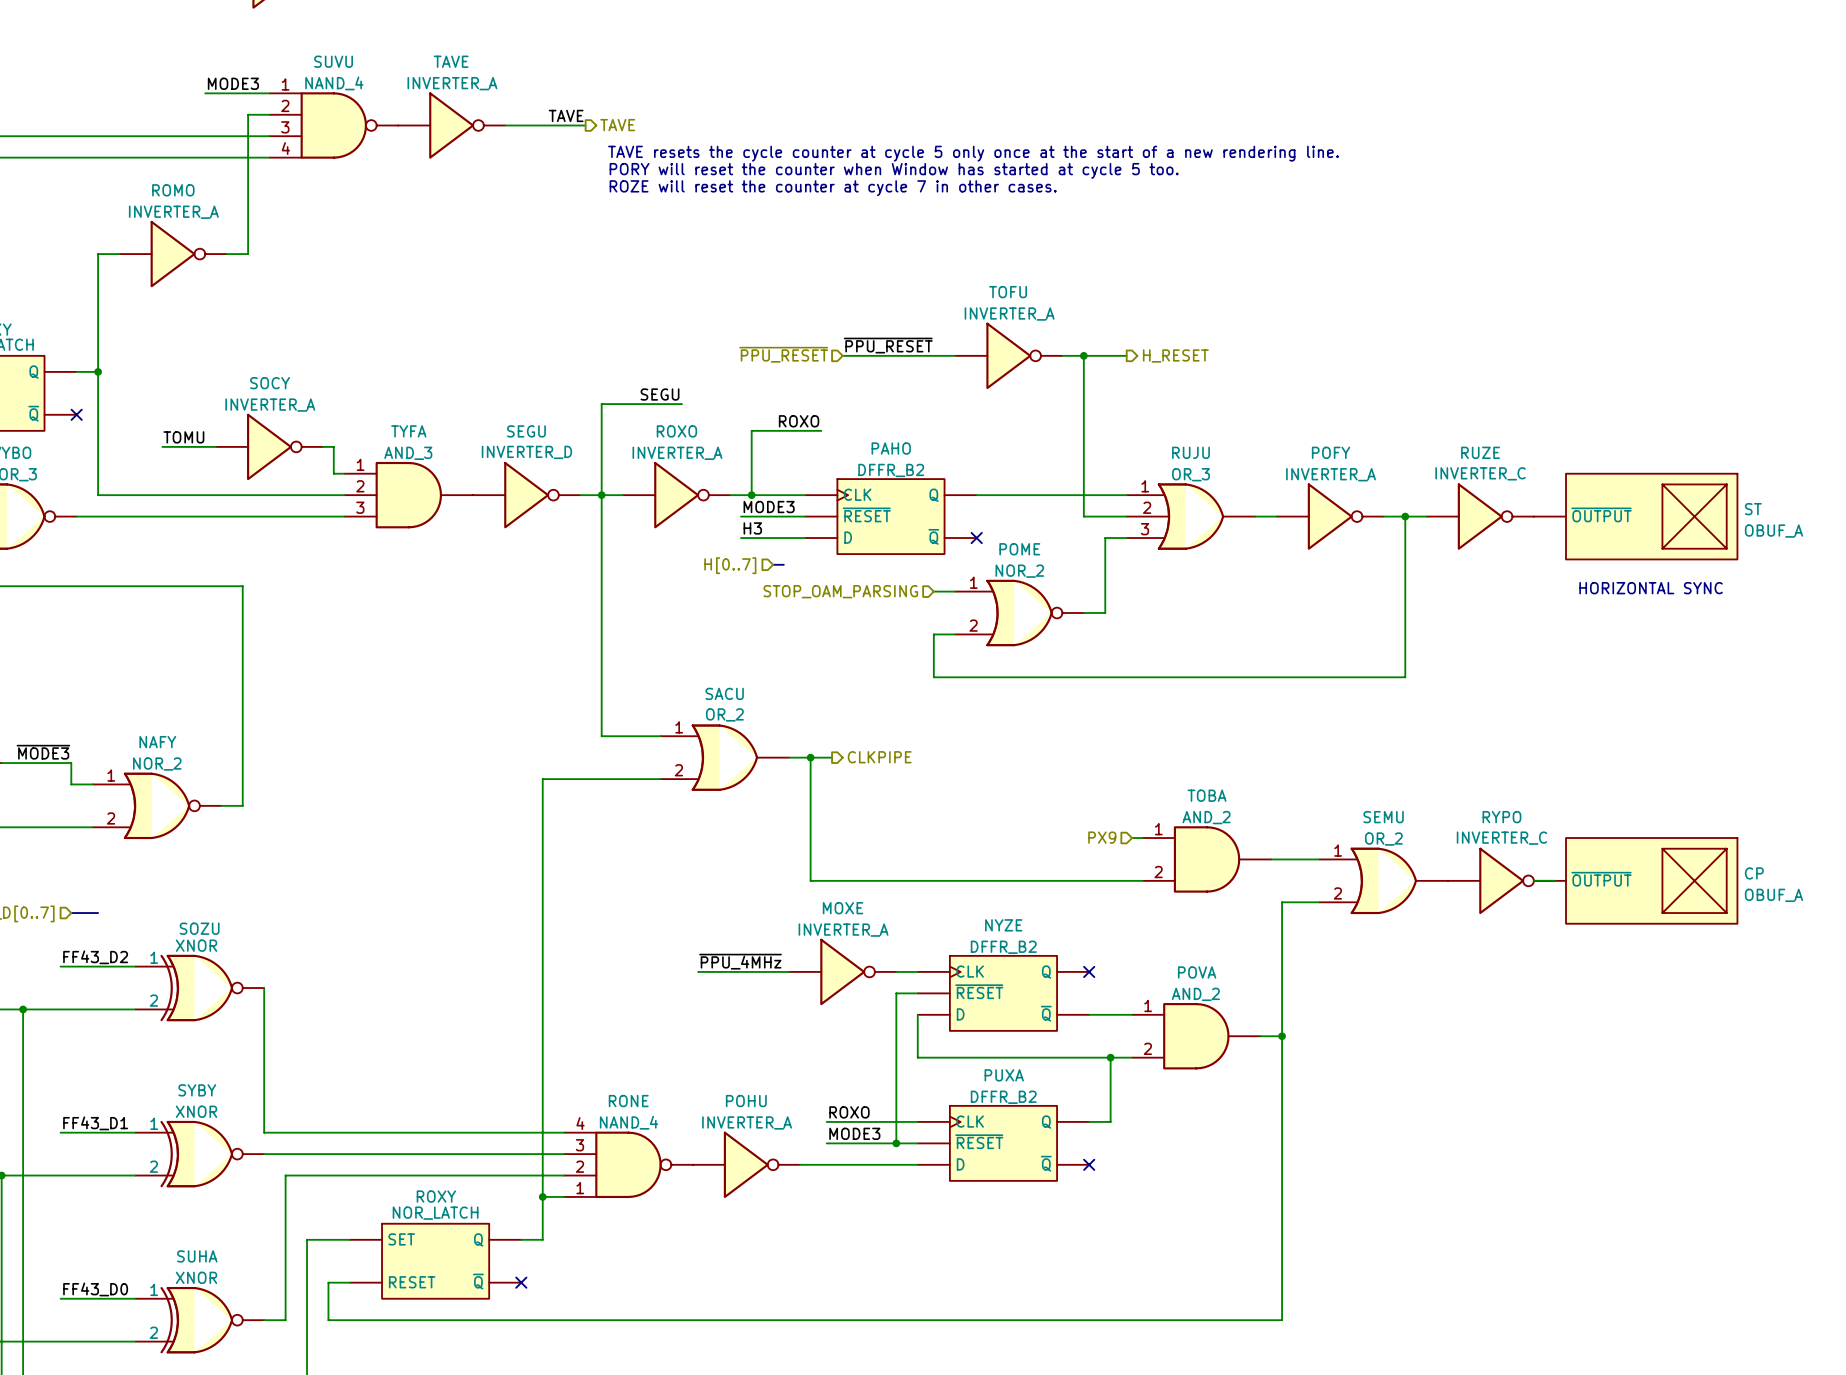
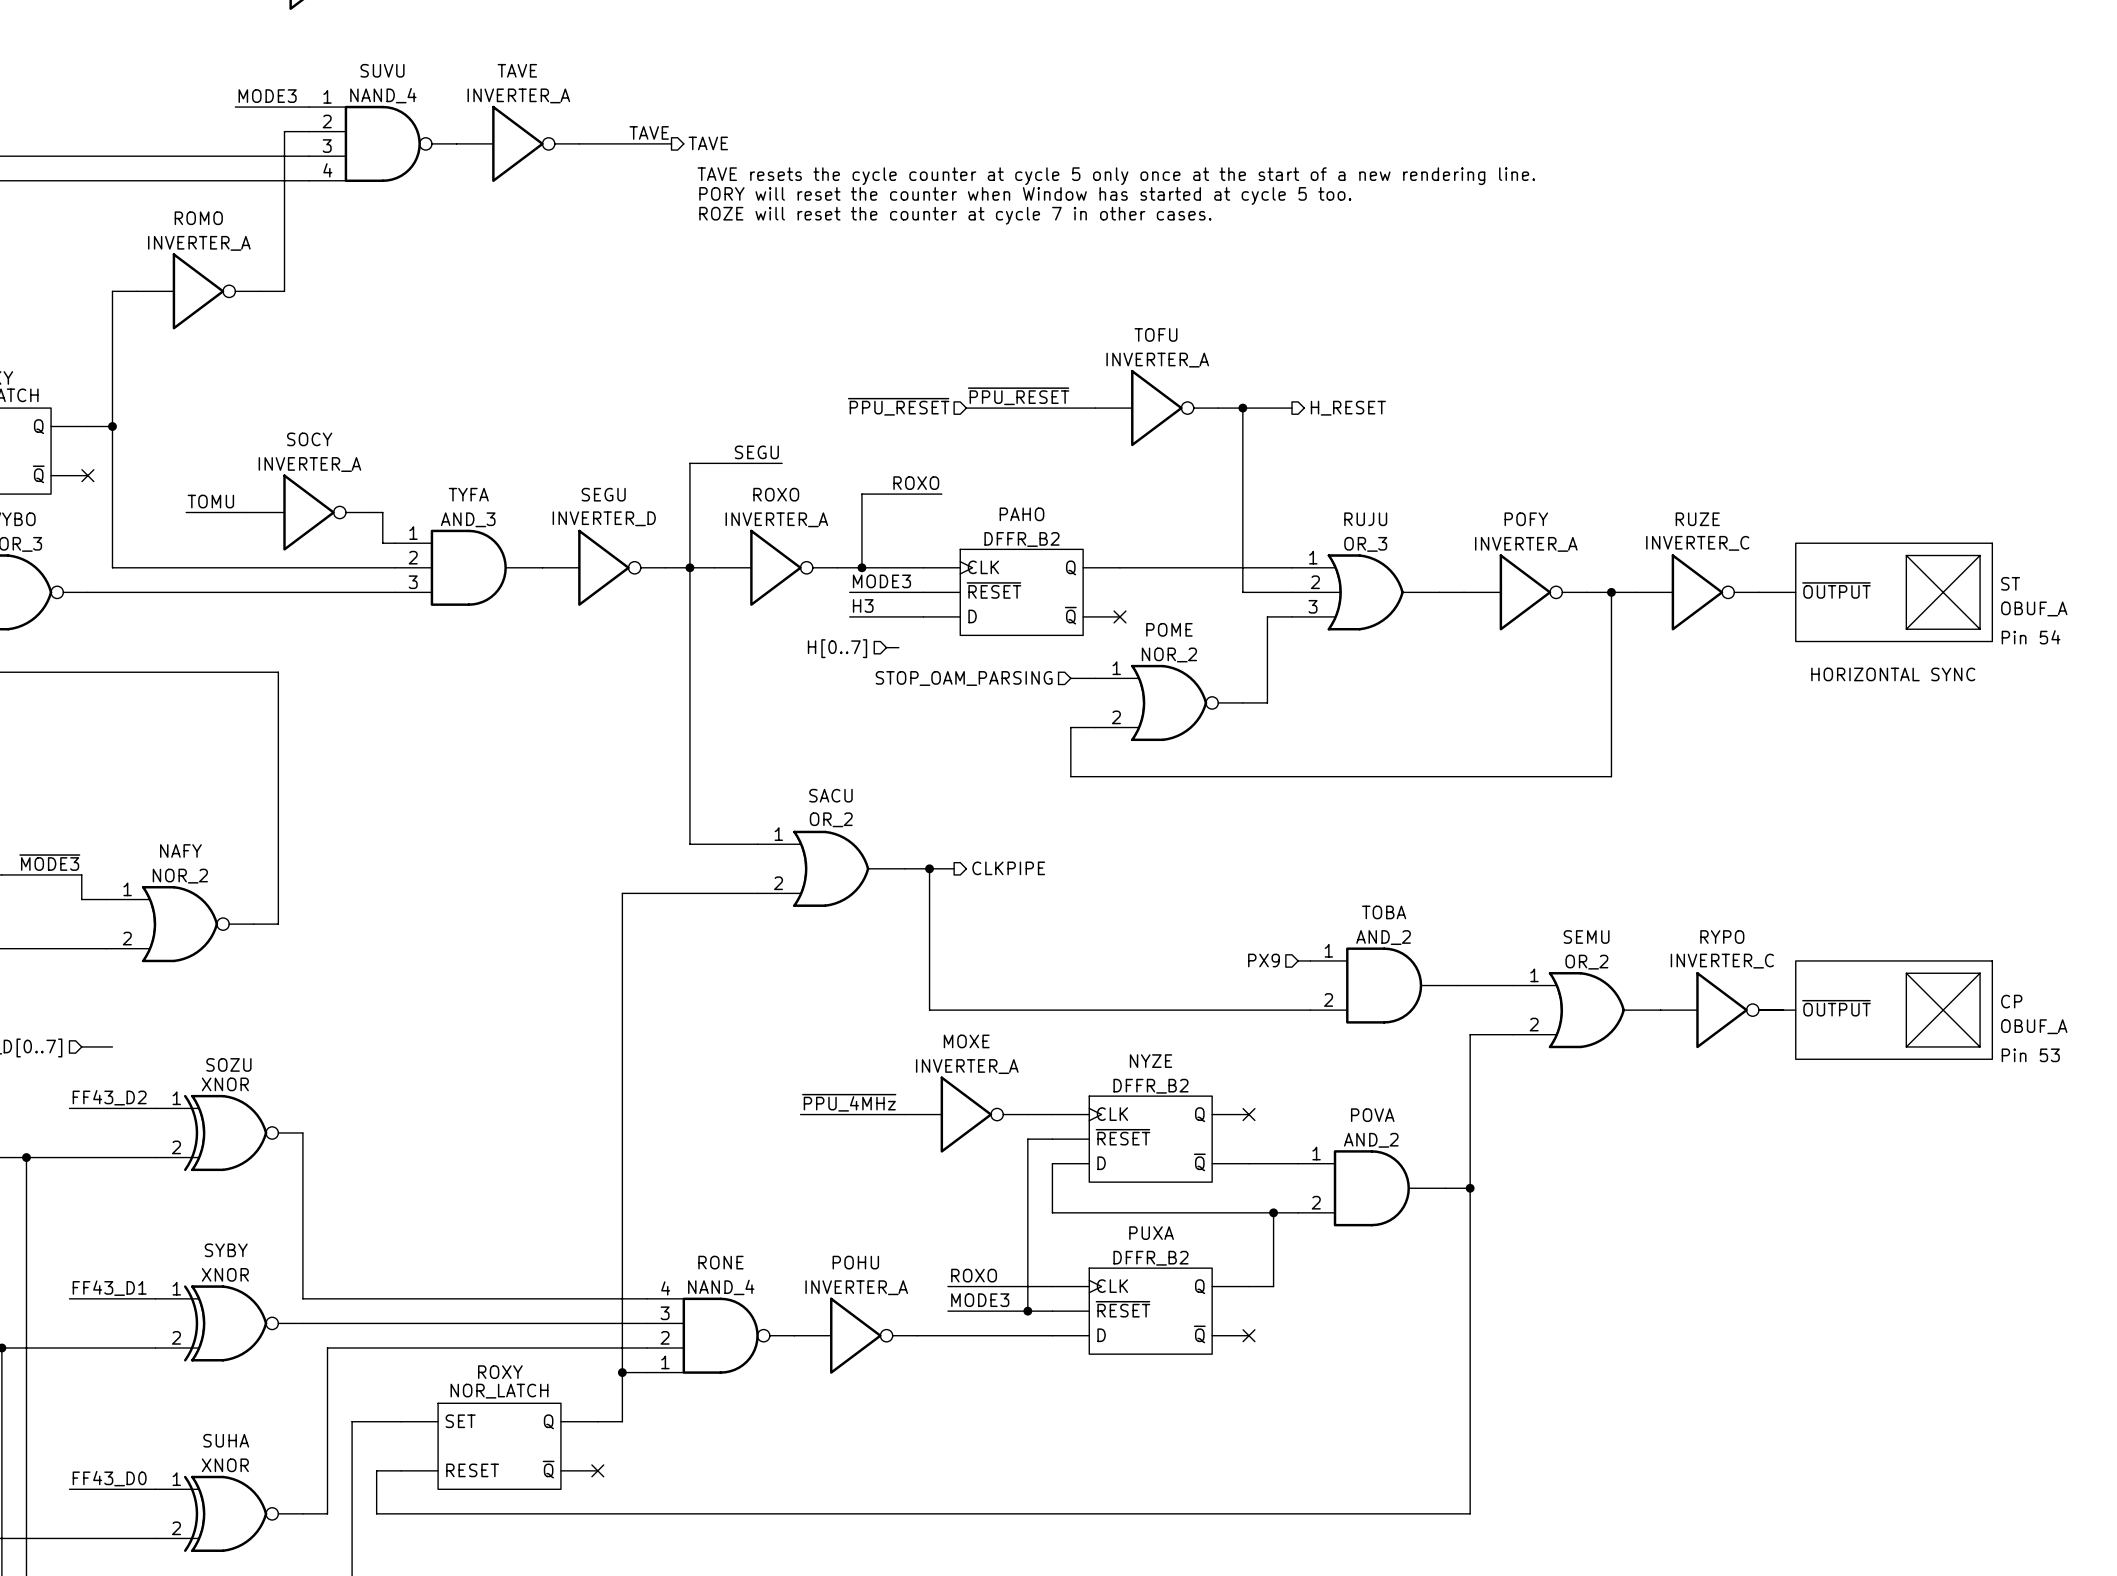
text: none -> Pin 54 (2031, 637)
text: none -> Pin 53 (2030, 1055)

